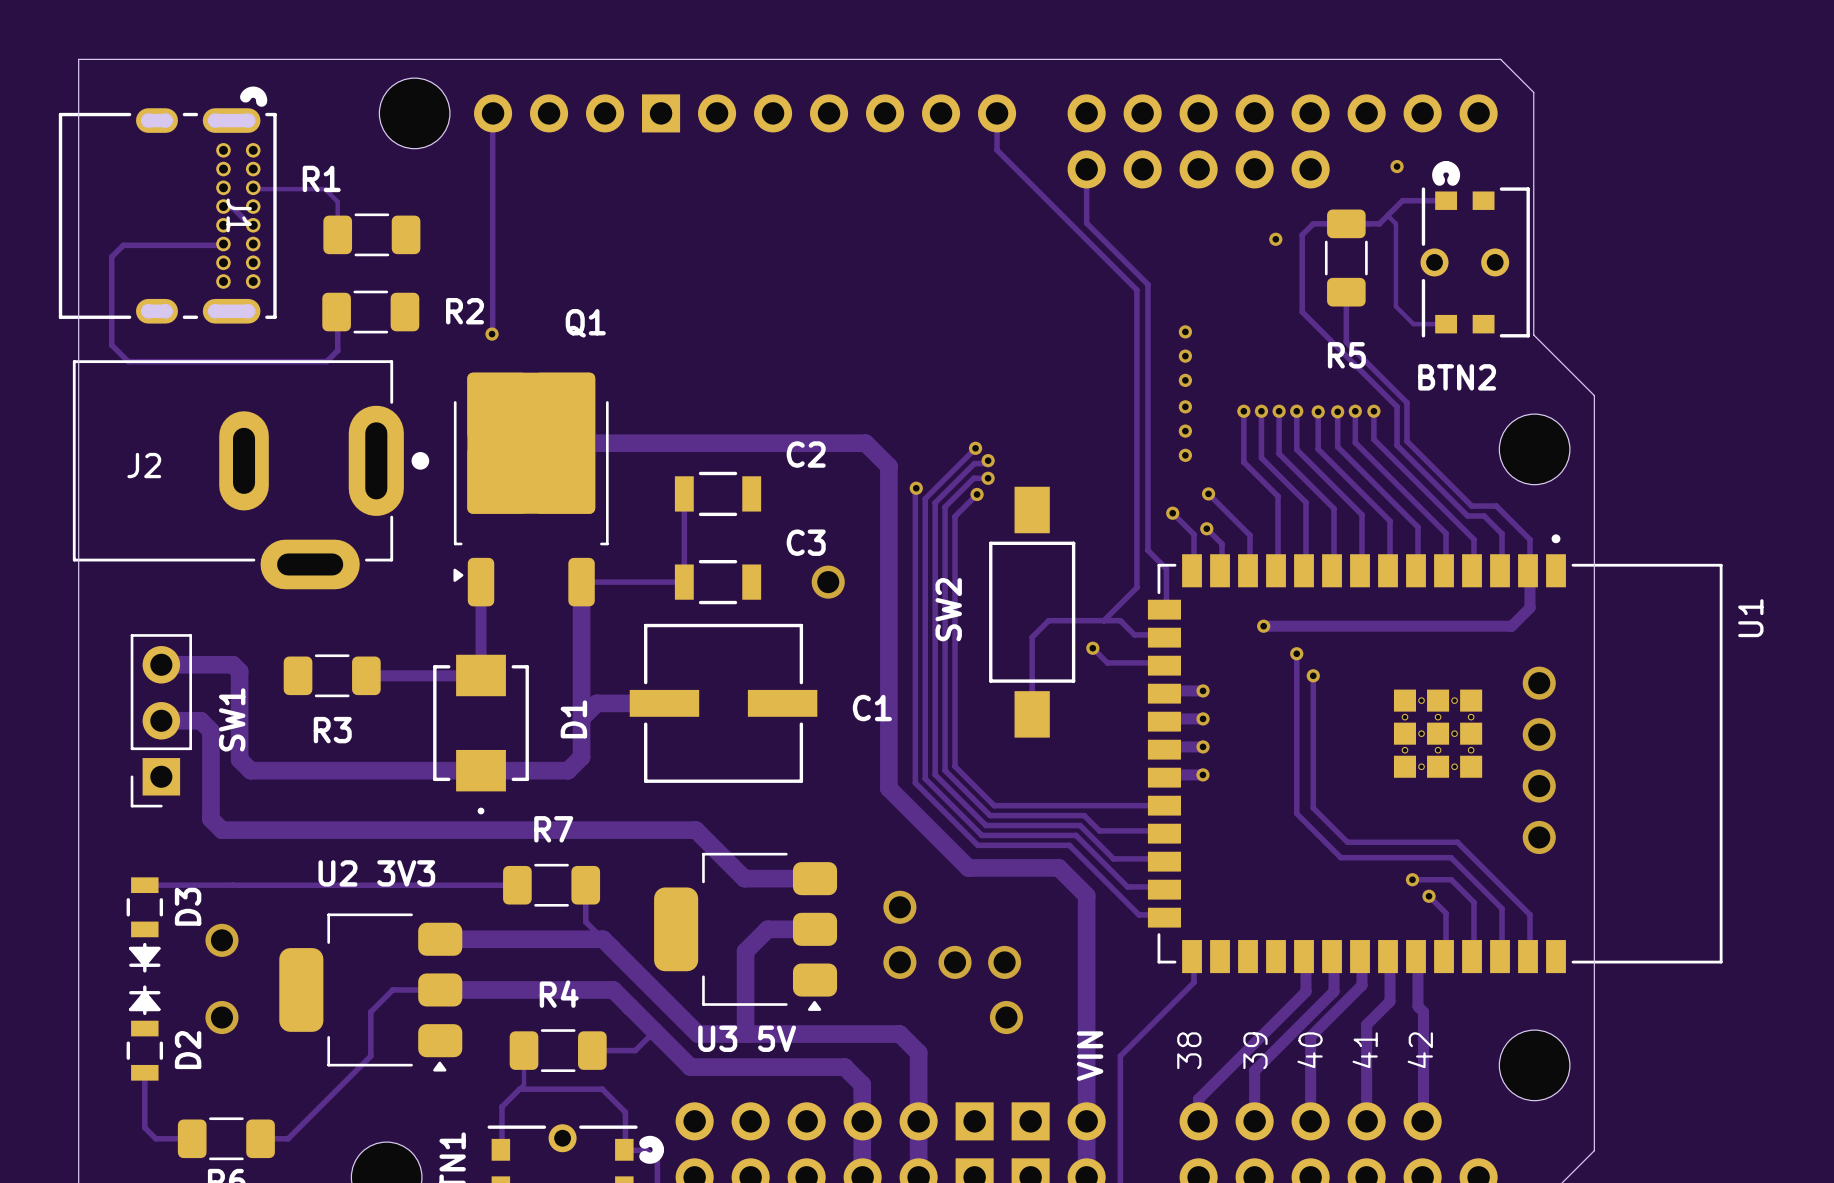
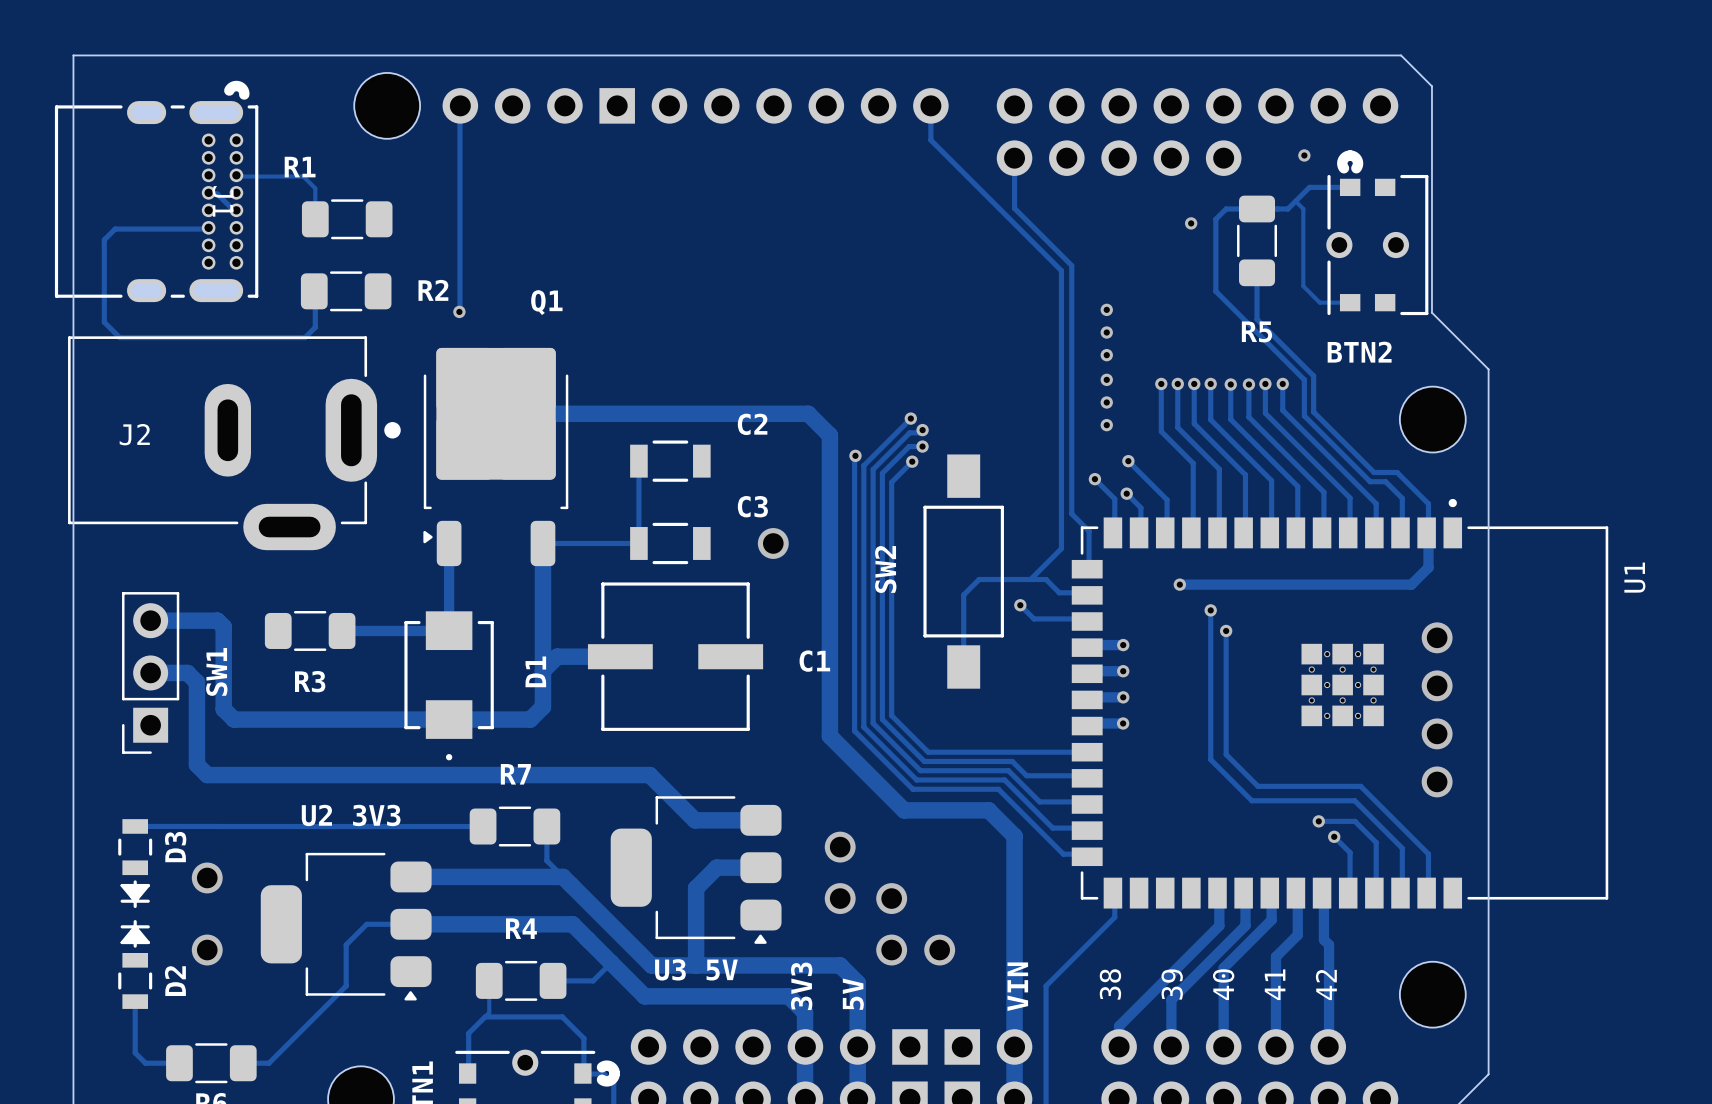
via position: (1004, 962) -> (891, 950)
text: none -> 3V3 (801, 986)
text: none -> 5V (853, 994)

